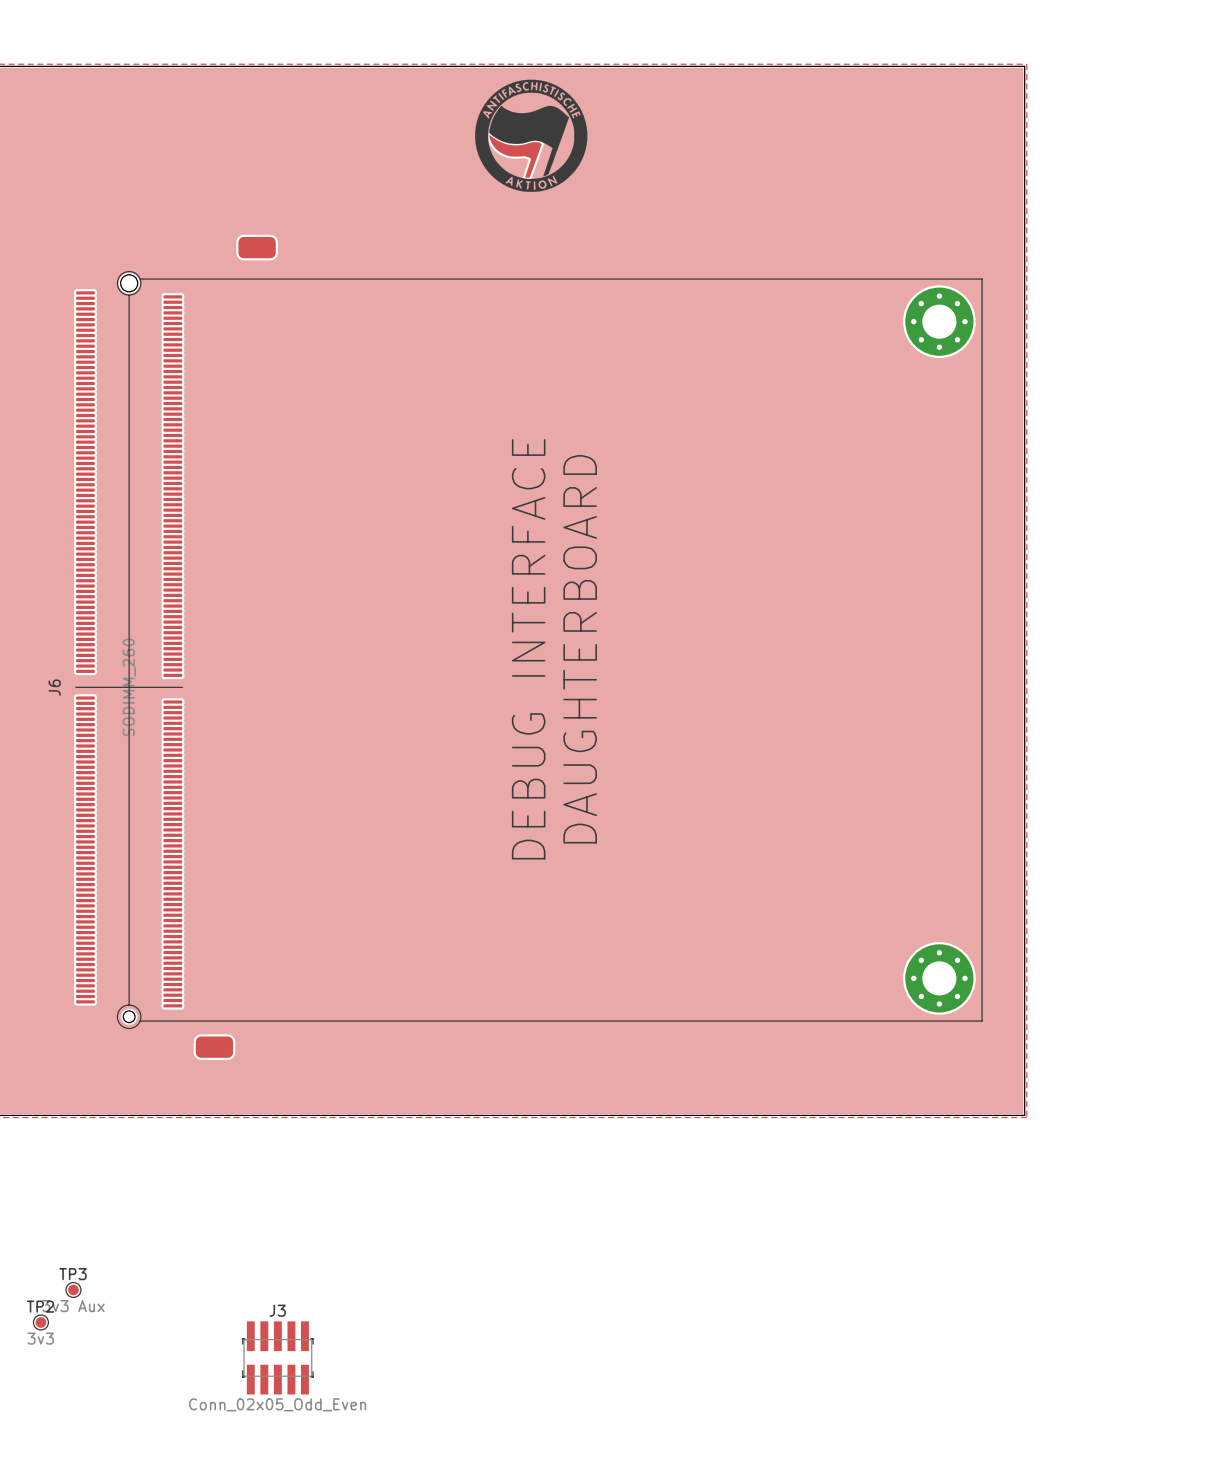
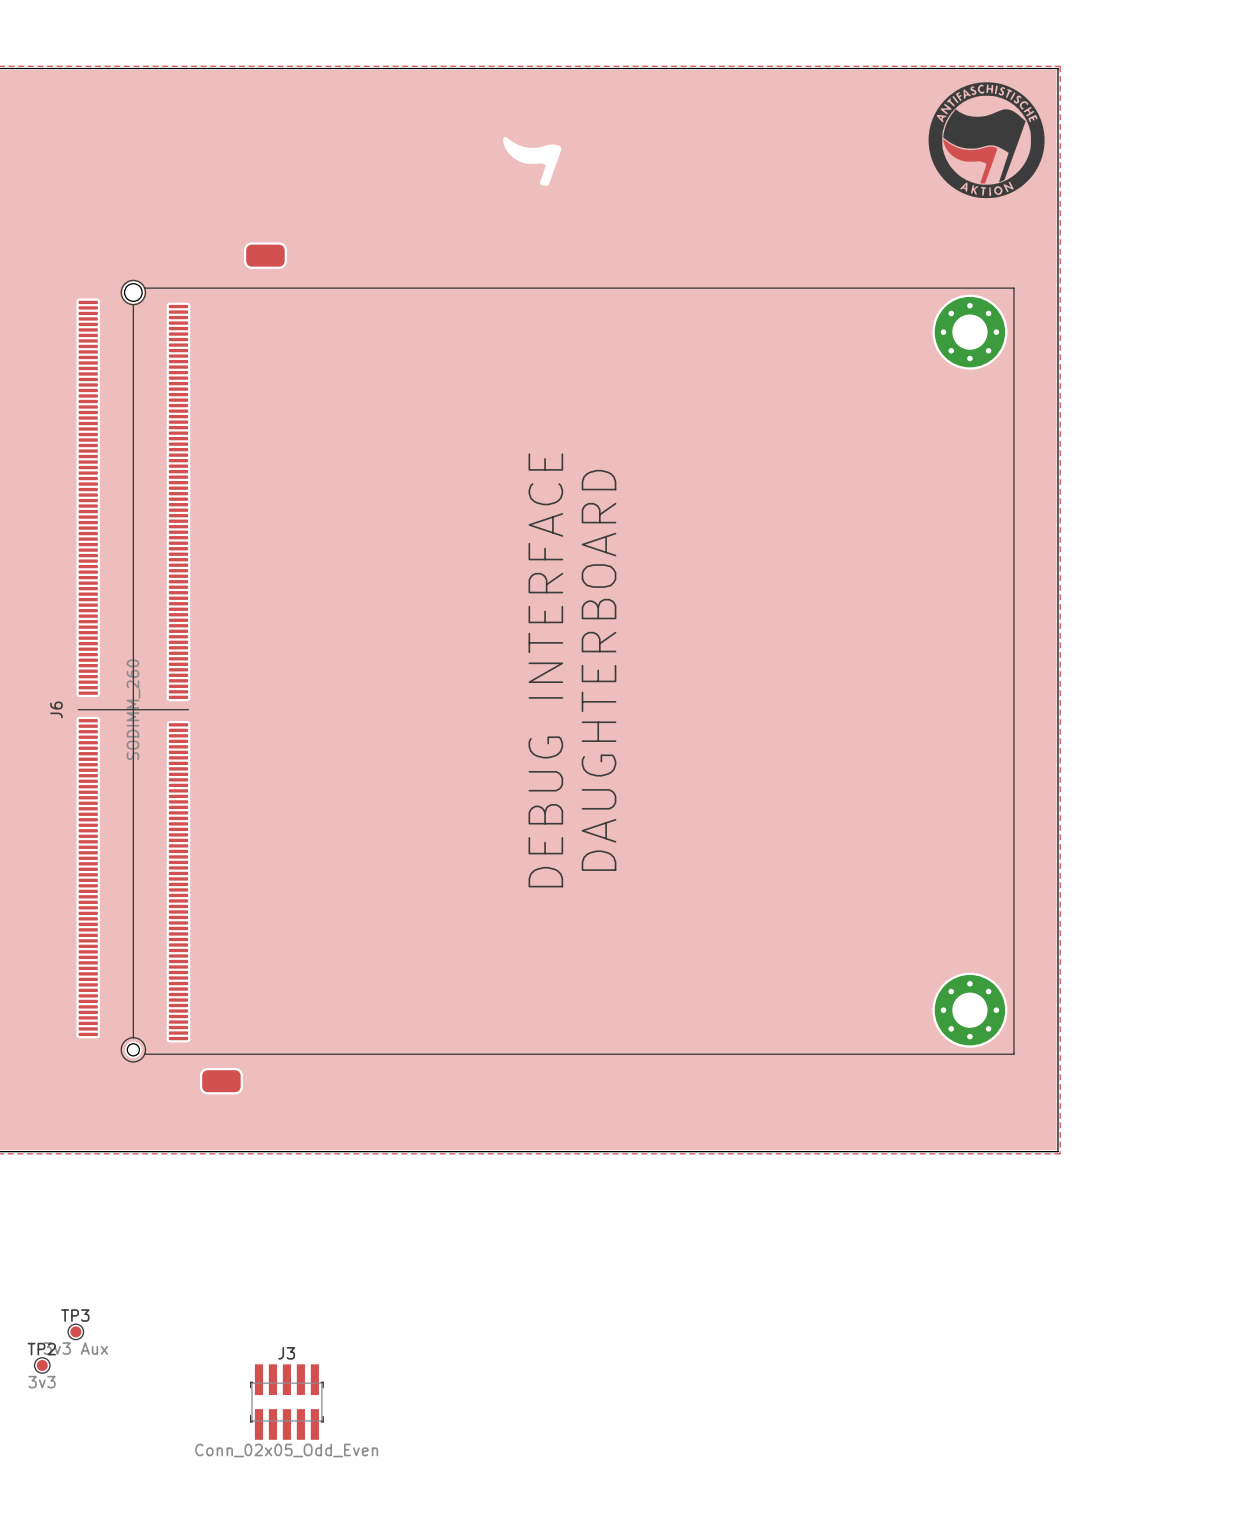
drawing: [475, 79, 588, 192] -> none
drawing: none -> [928, 82, 1045, 199]

